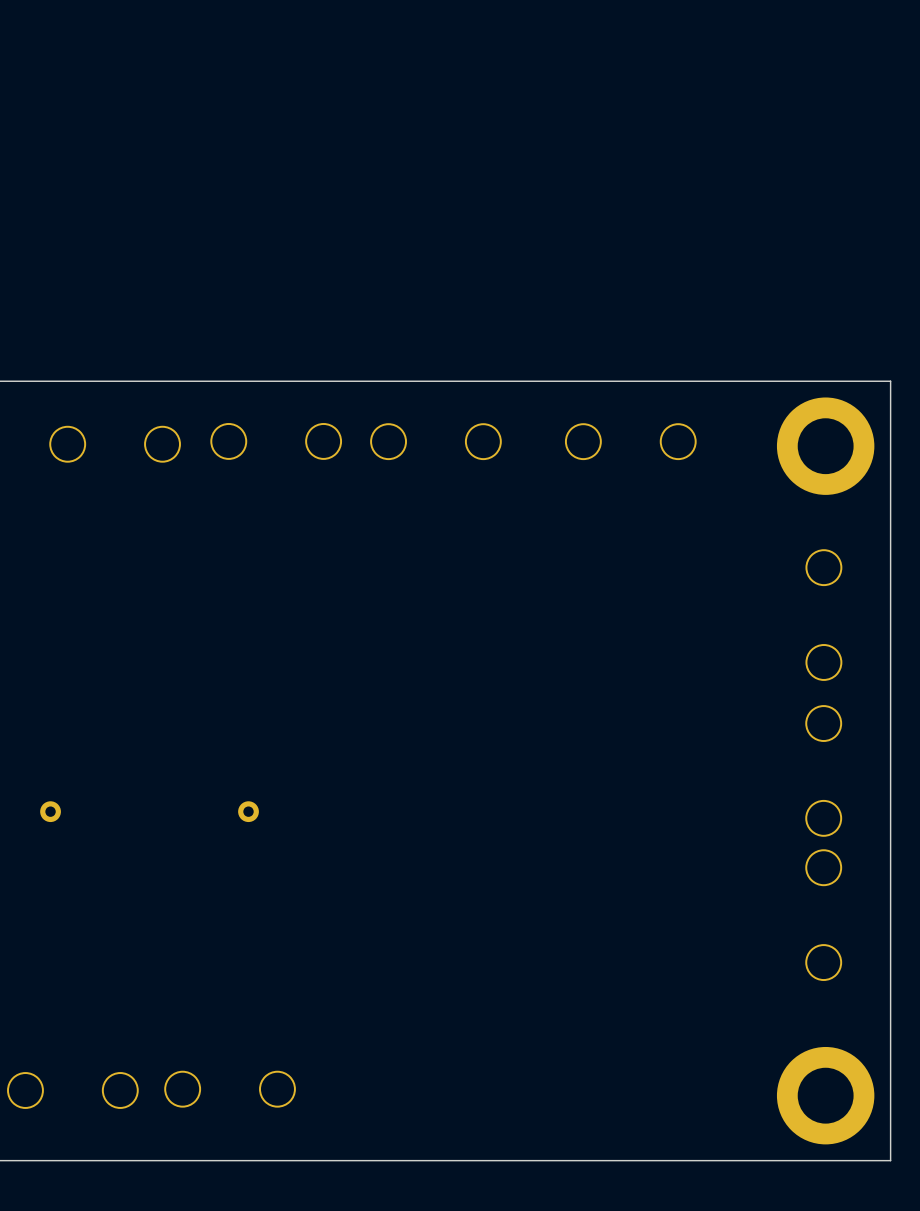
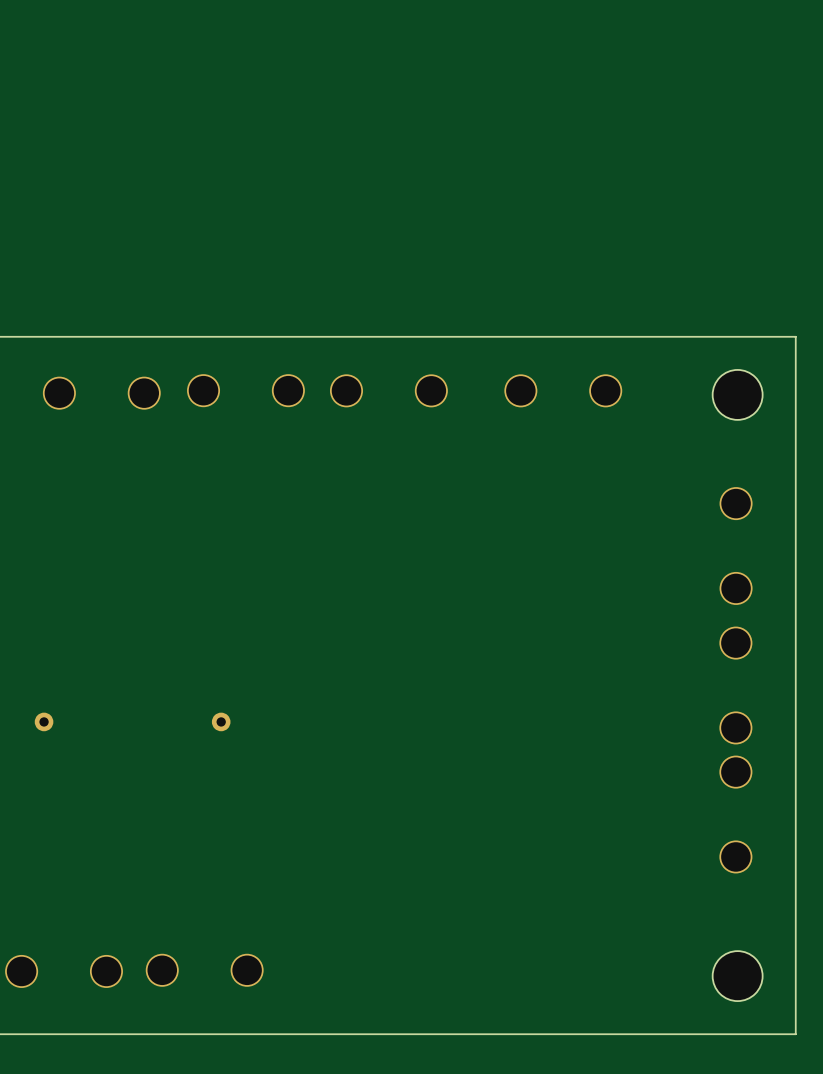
part footprint: [776, 397, 875, 495] -> [712, 369, 763, 420]
part footprint: [776, 1046, 875, 1145] -> [712, 951, 763, 1002]

